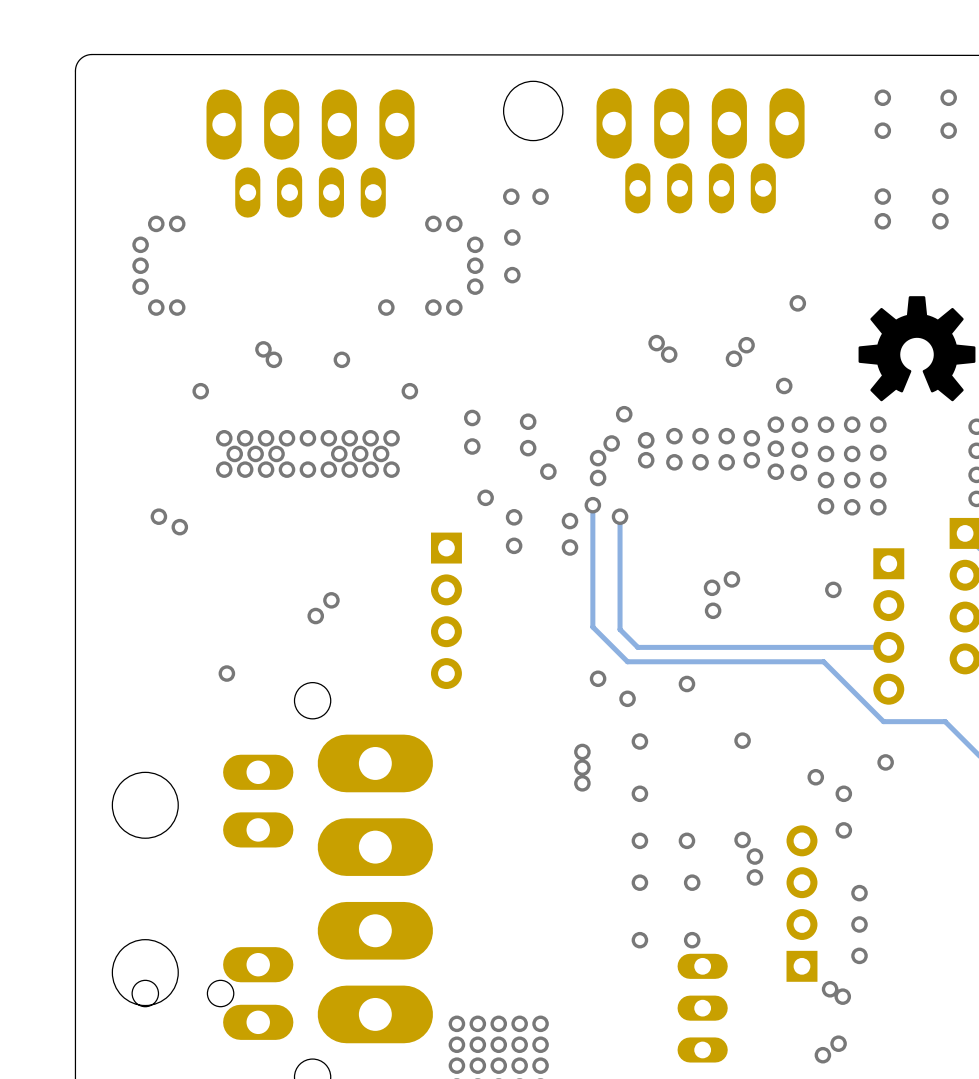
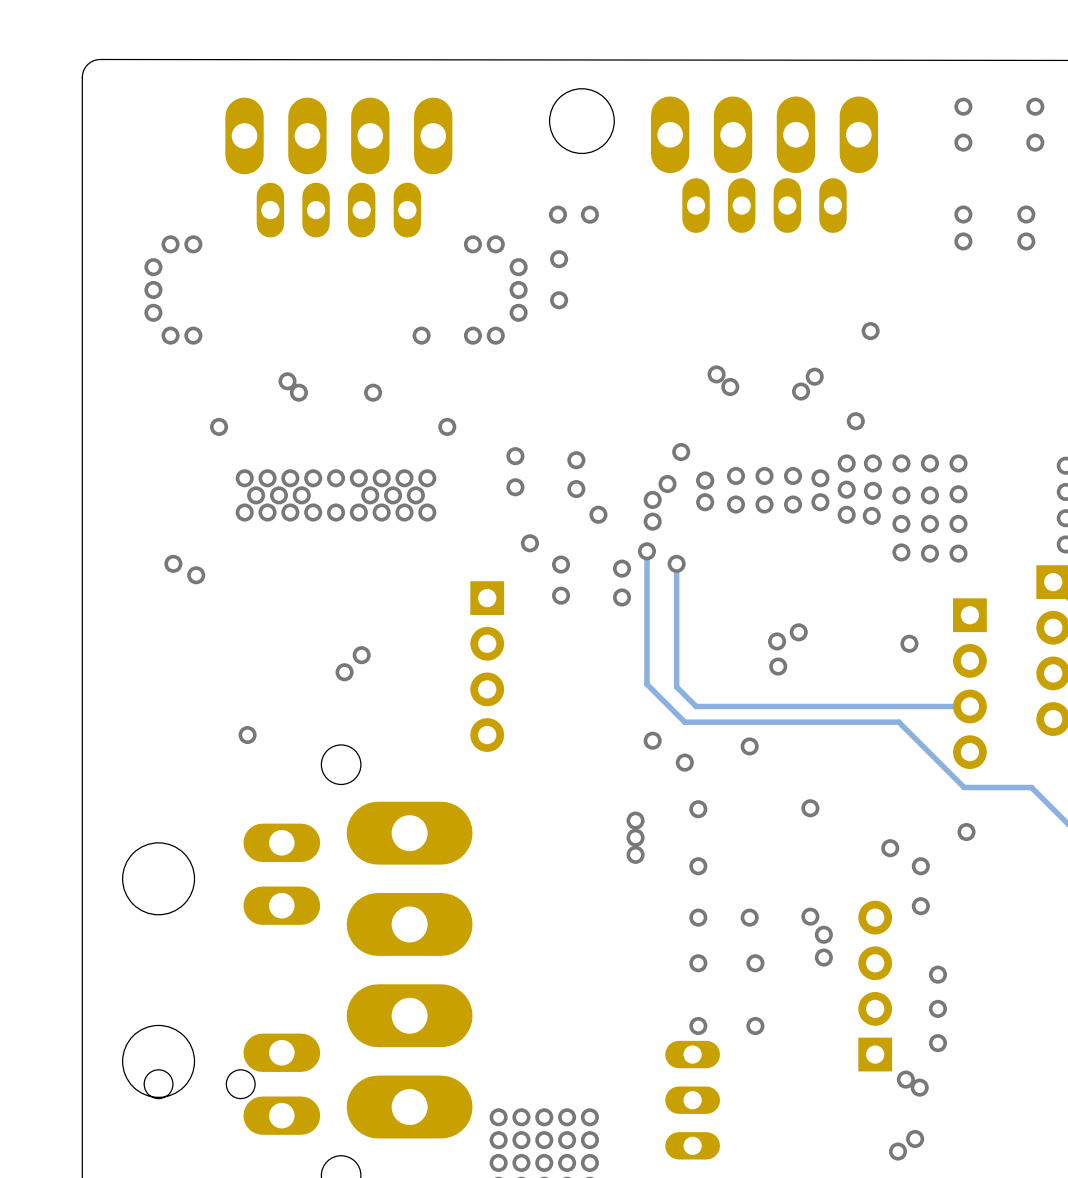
drawing: [858, 296, 976, 402] -> none
part position: (702, 1008) -> (692, 1100)

